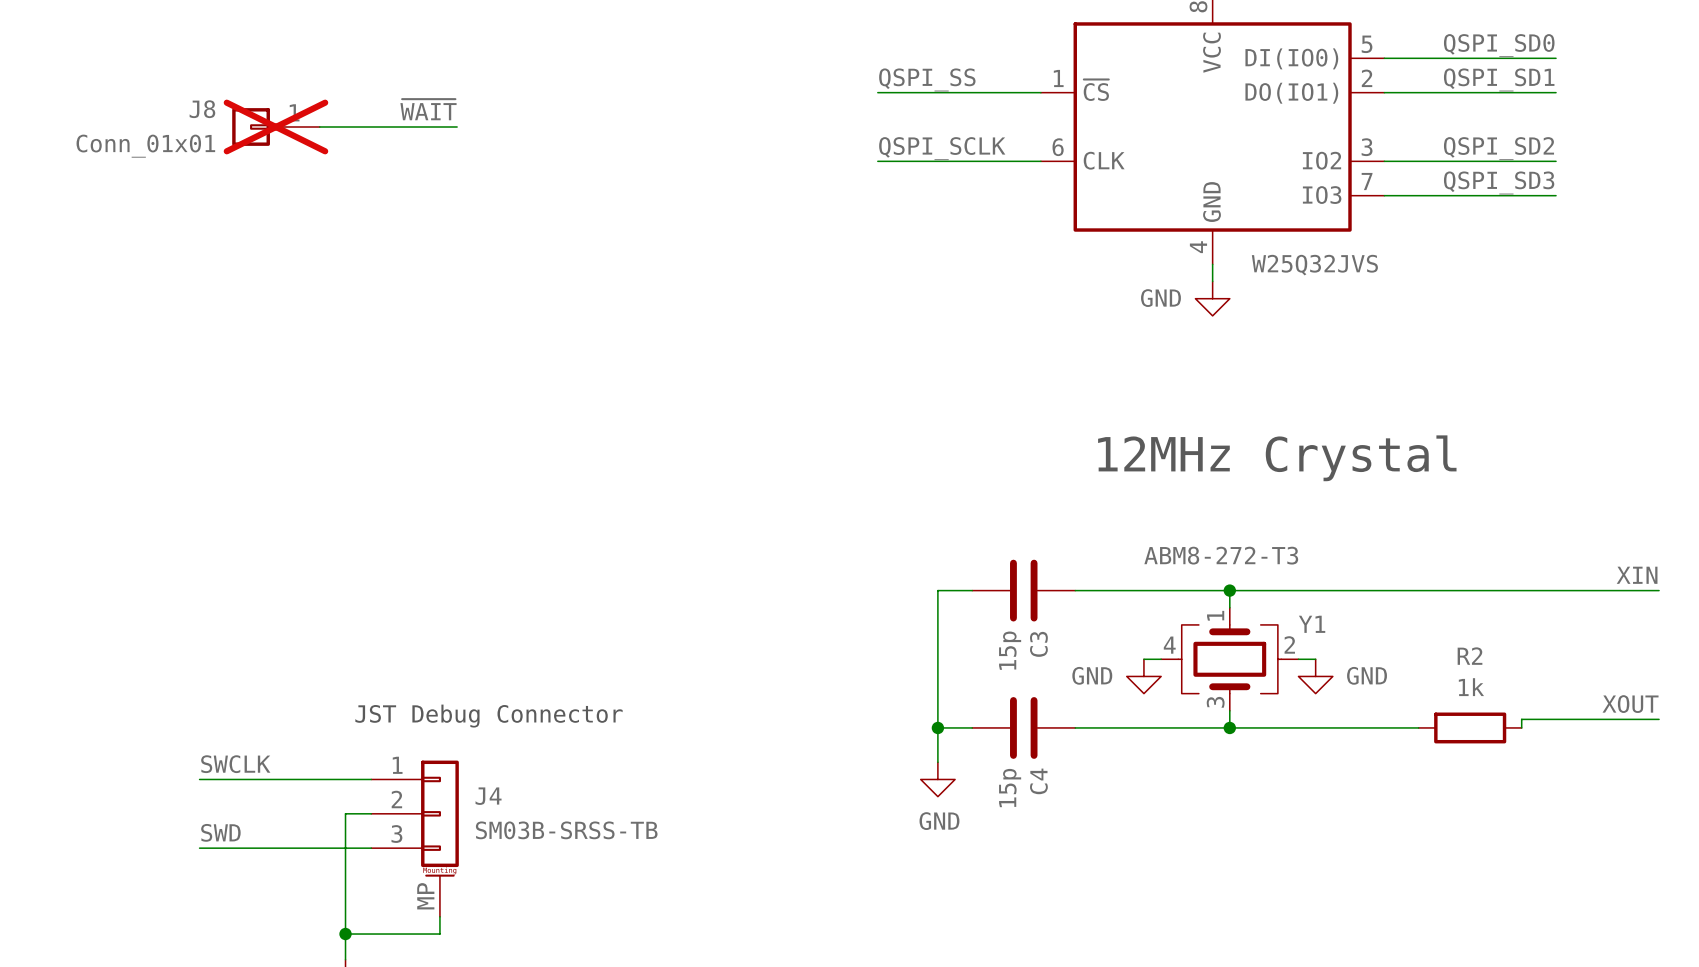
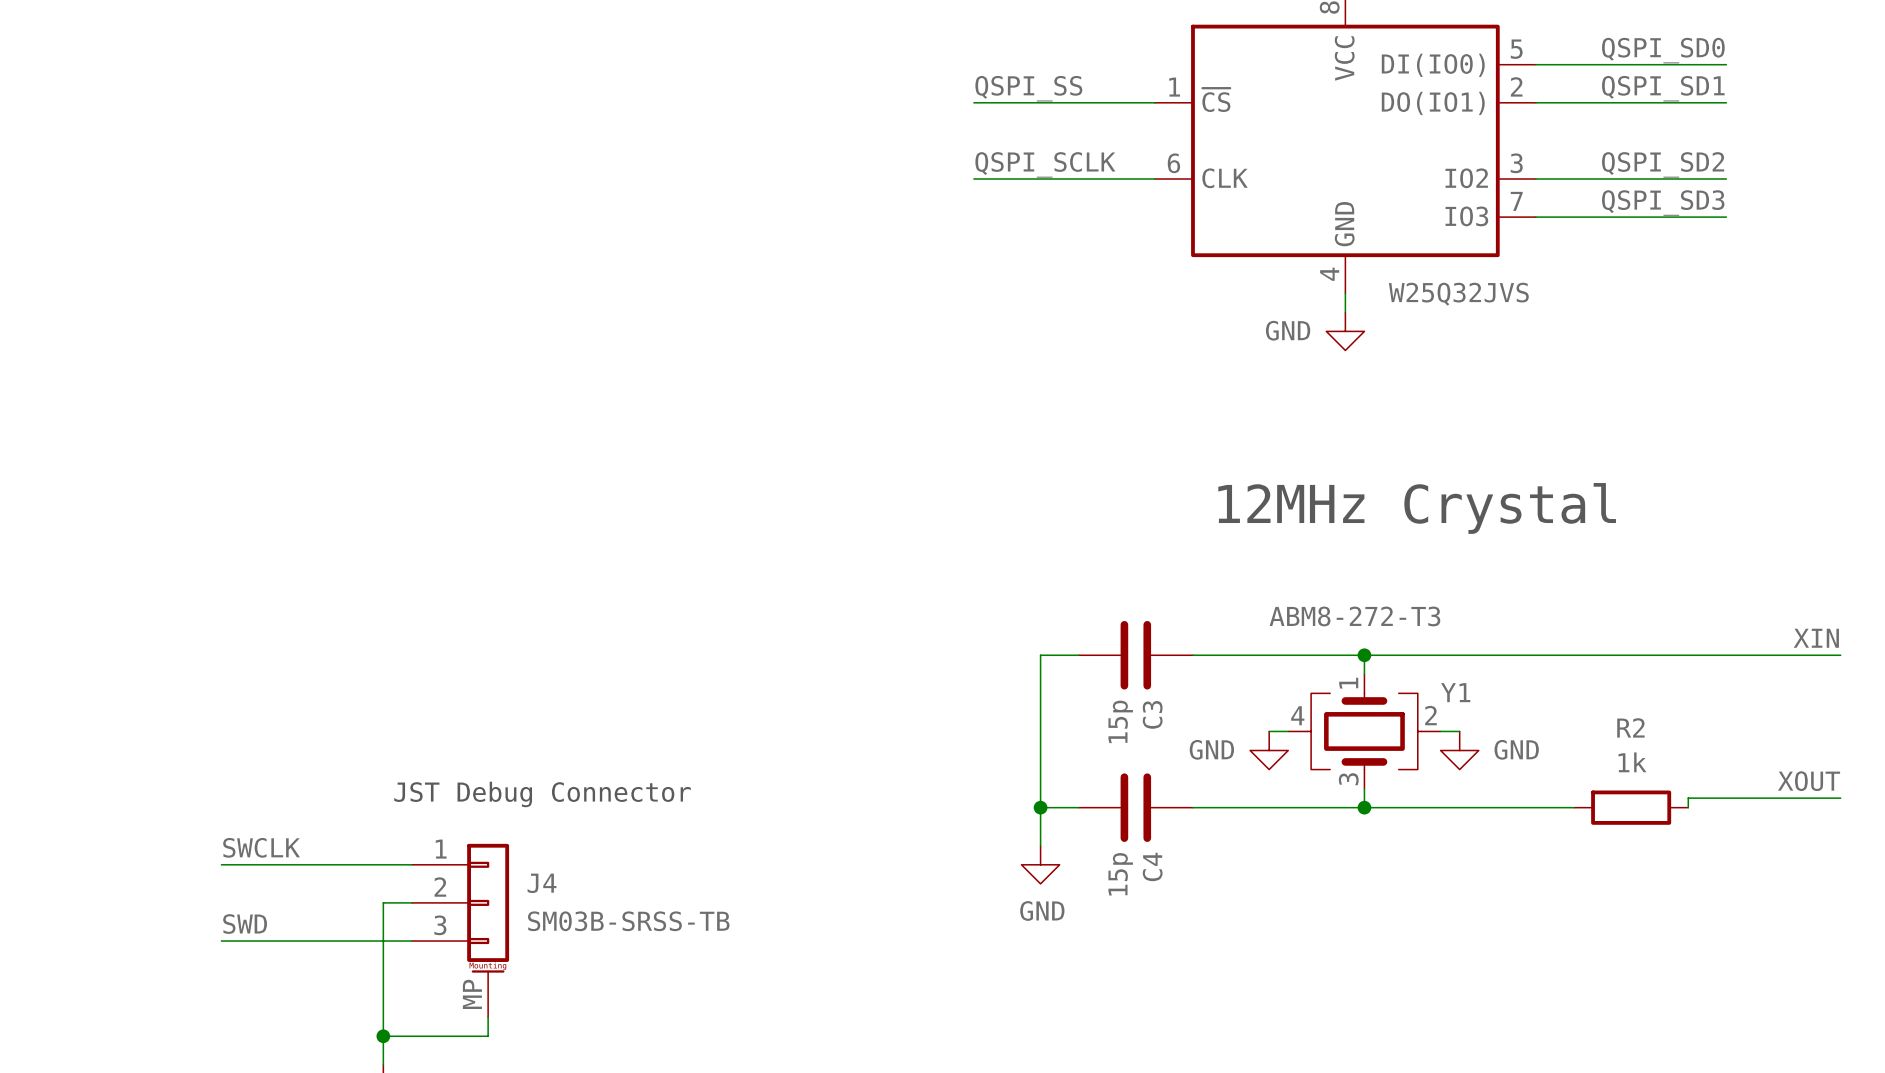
label: ~{WAIT} (428, 109) -> none
J8: Conn_01x01 (275, 126) -> none
wire: (319, 126) (457, 126) -> none

